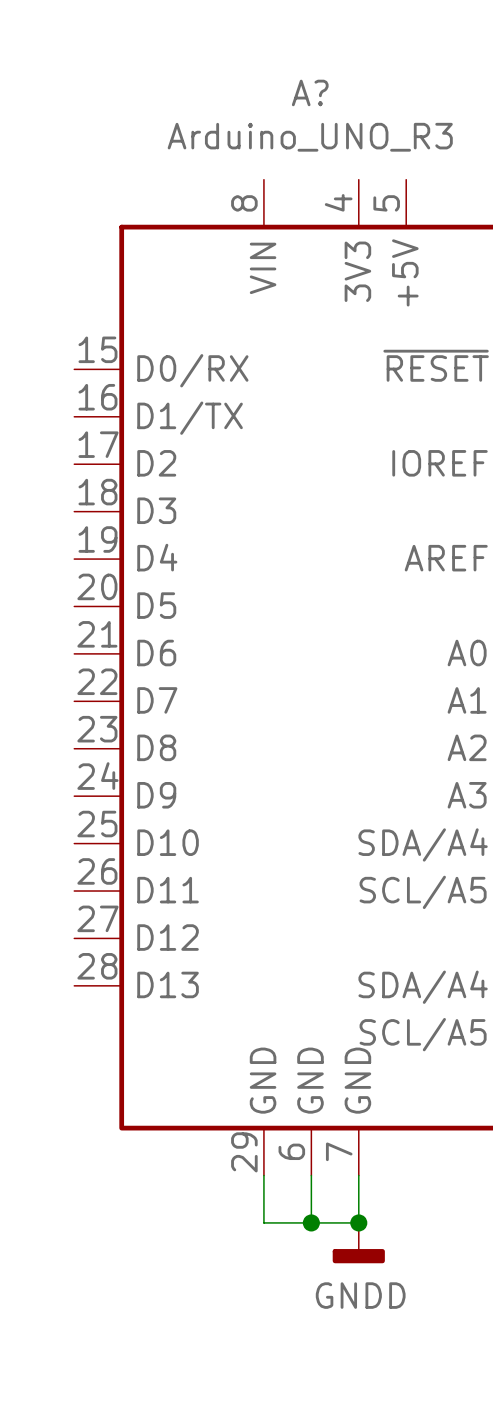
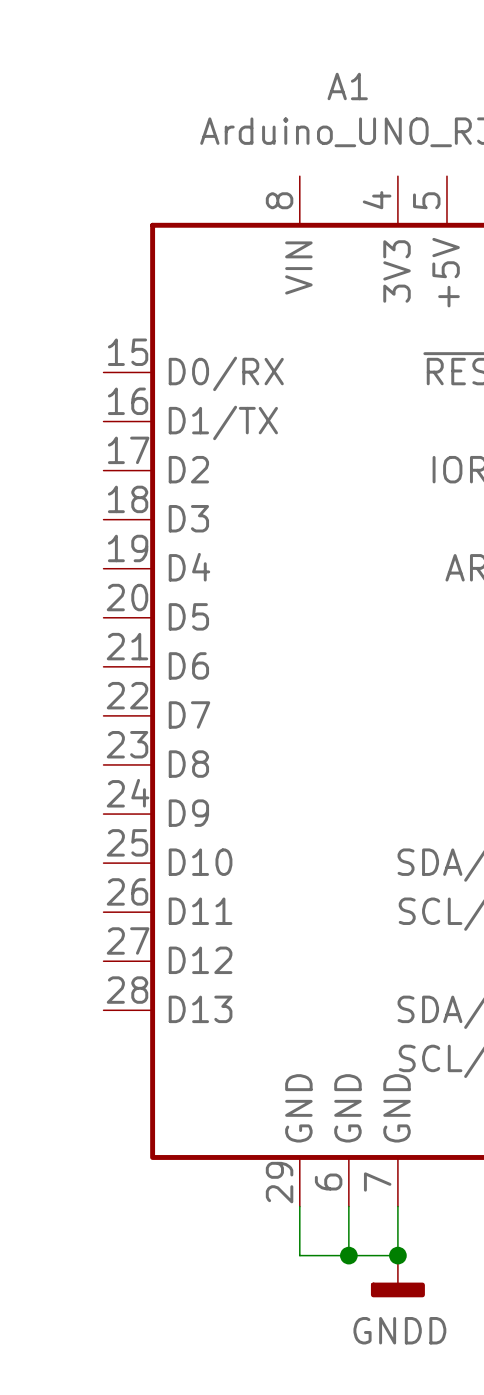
A? name: A? (310, 92) -> A1 (347, 86)

